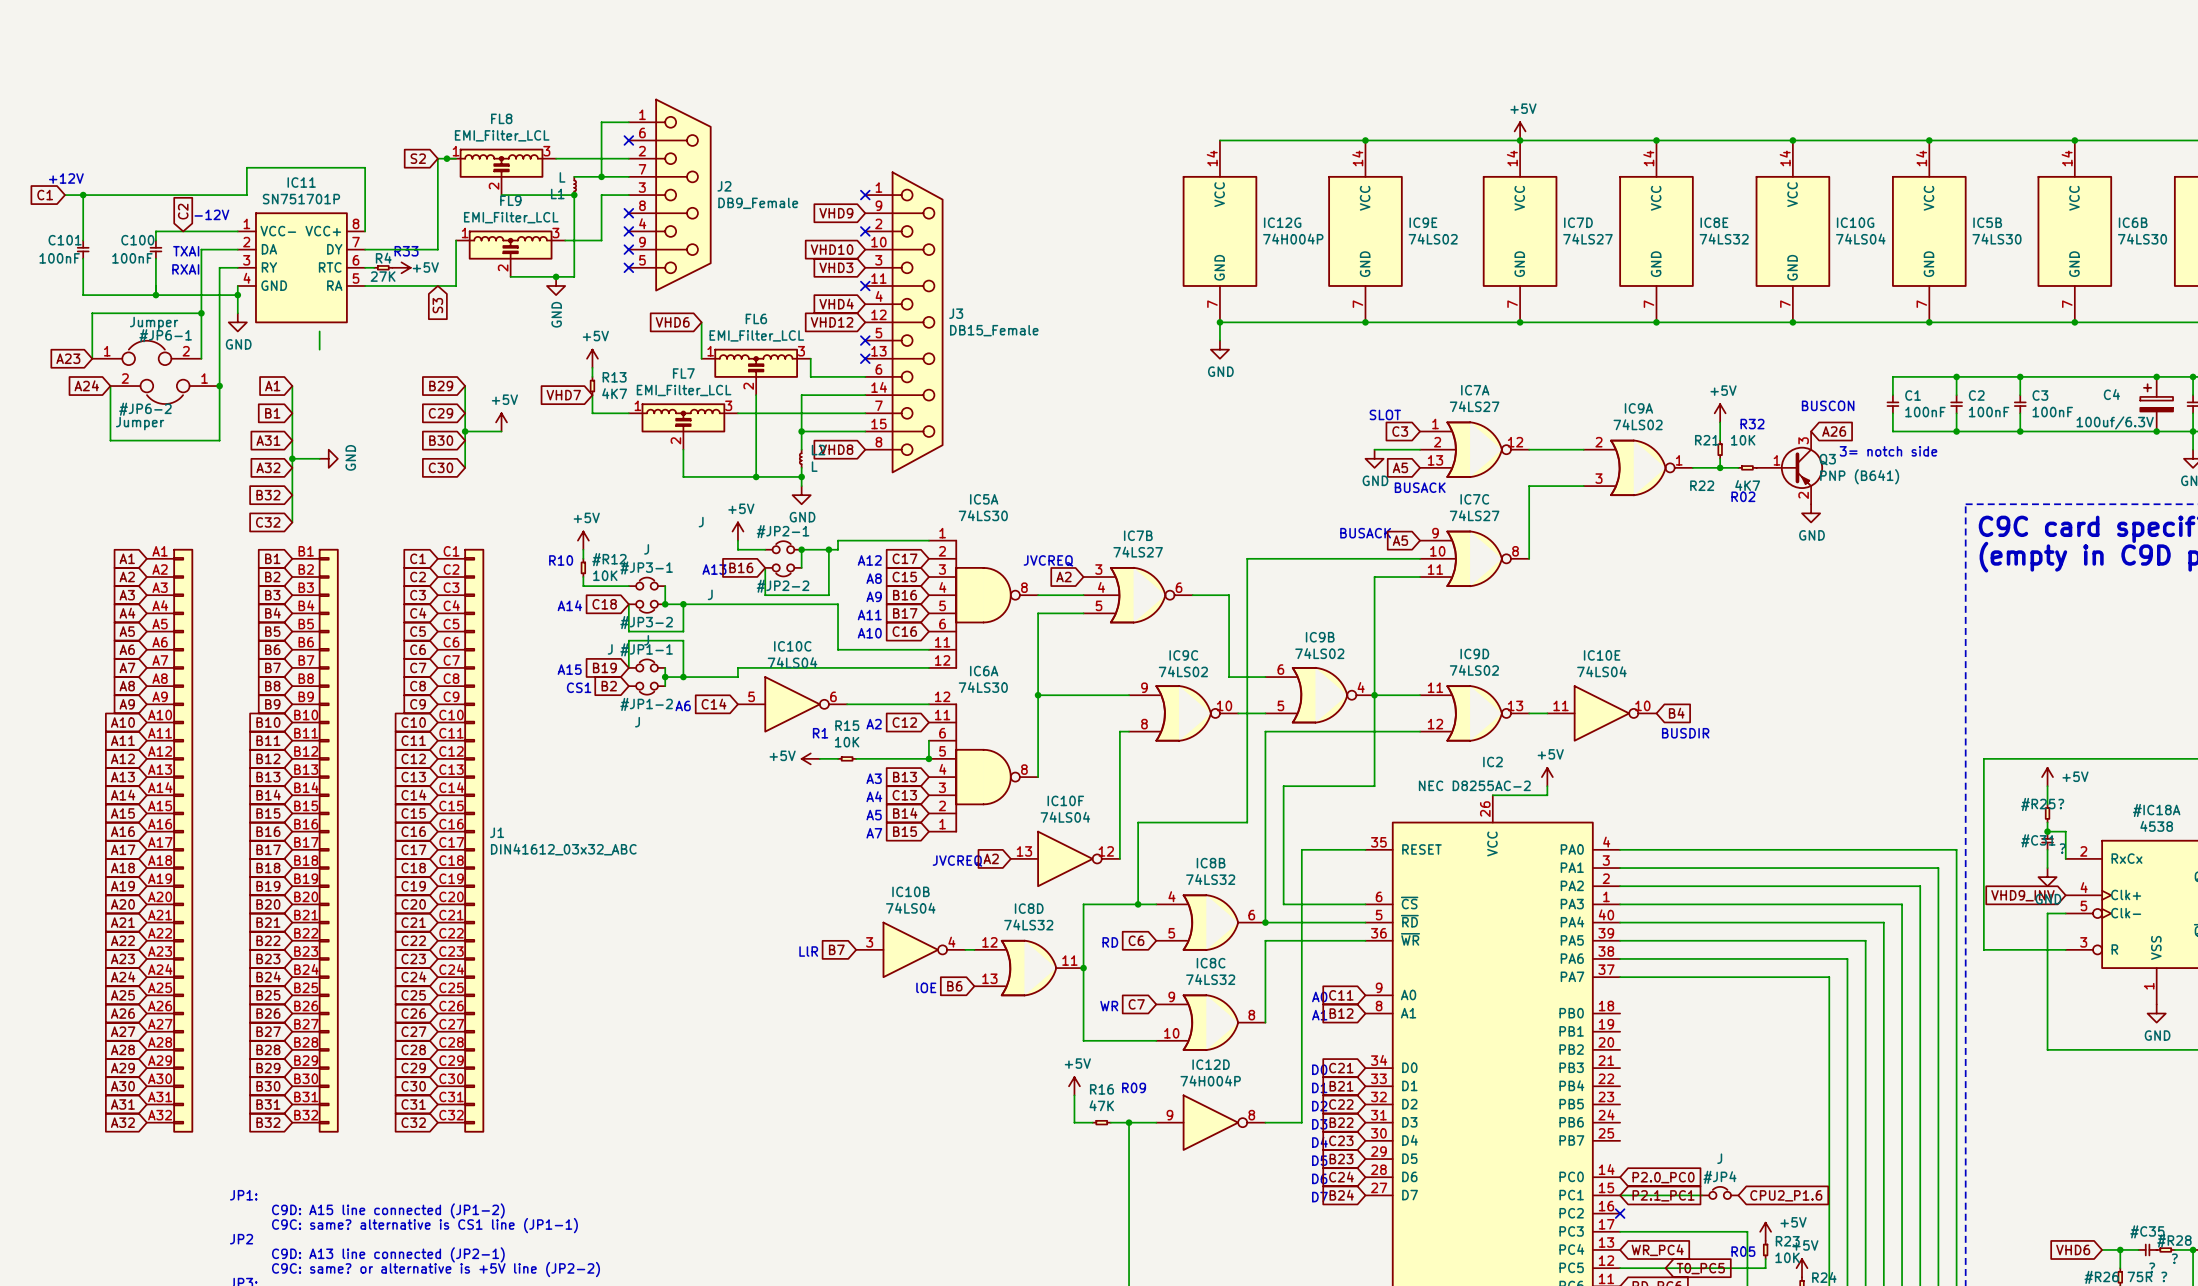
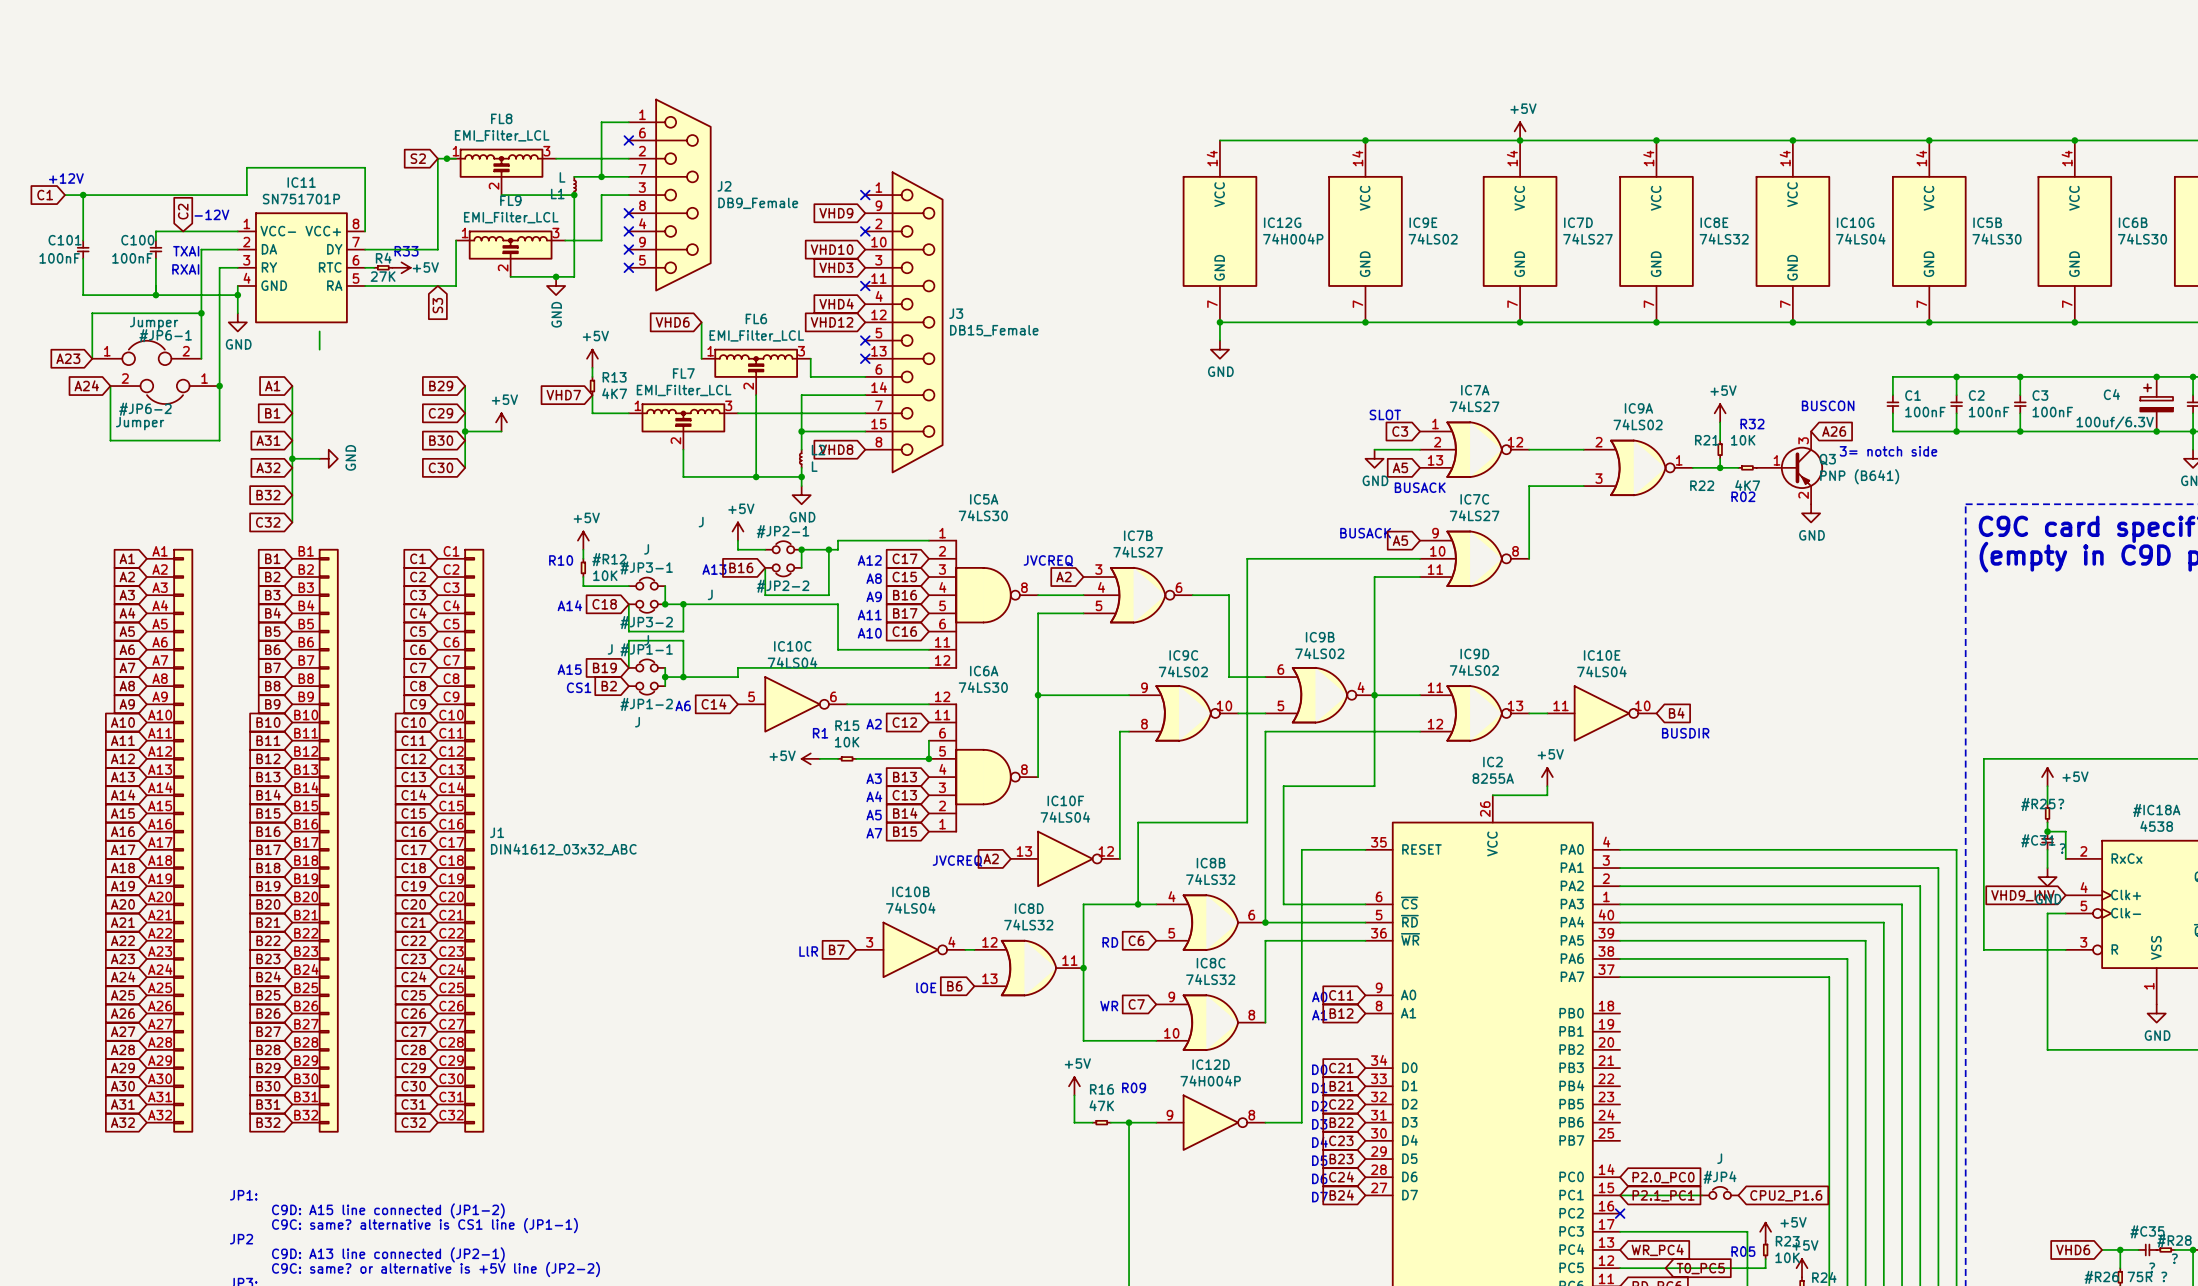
IC2 value: NEC D8255AC-2 (1474, 785) -> 8255A (1493, 778)

